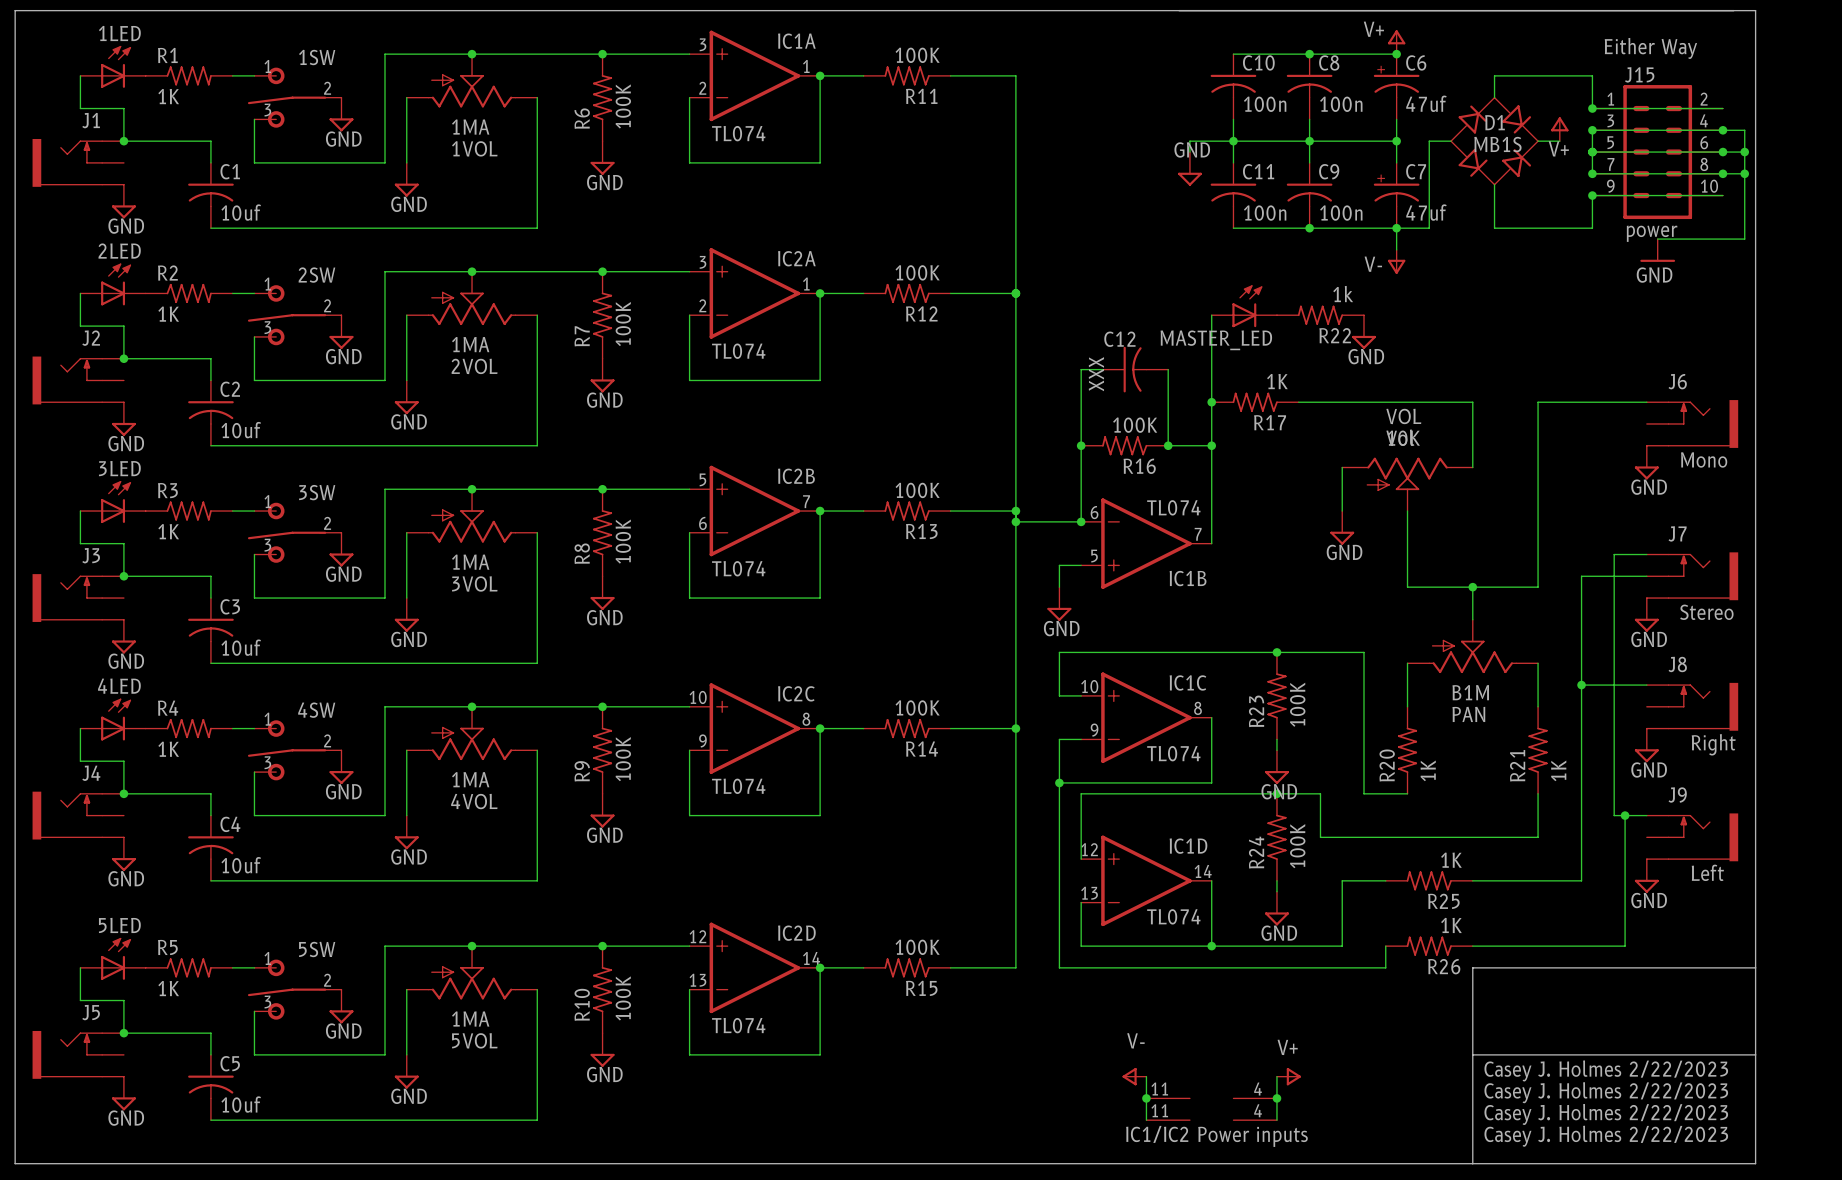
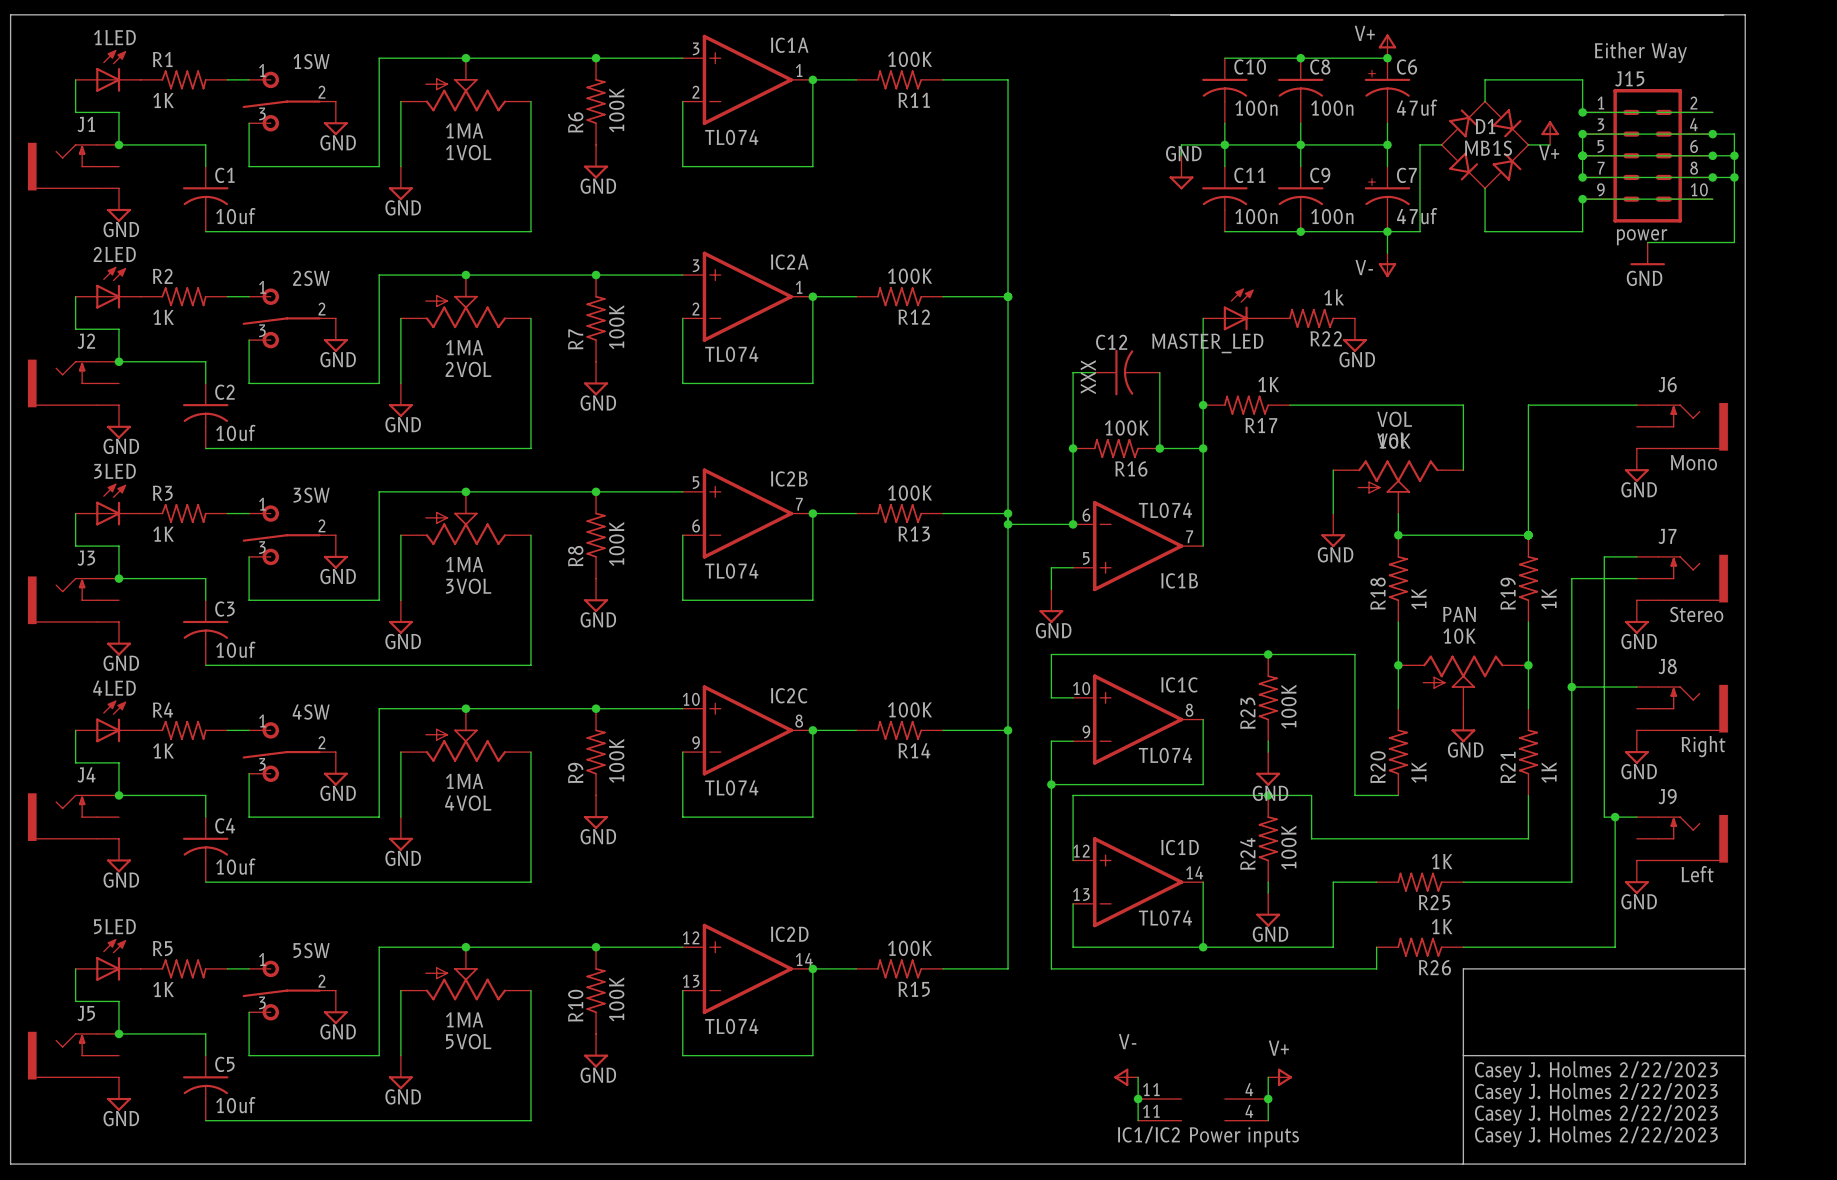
wire: (1407, 532) (1407, 587) (1538, 587) (1538, 532) -> (1398, 535) (1528, 535)
junction: none -> (1398, 535)
junction: none -> (1528, 535)
R18: none -> 1K (1398, 578)
R19: none -> 1K (1528, 578)
wire: (1472, 587) (1472, 619) -> none
junction: (1472, 587) -> none
wire: none -> (1398, 621) (1398, 665)
wire: none -> (1528, 621) (1528, 665)
PAN: B1M (1472, 646) -> none
junction: none -> (1398, 665)
junction: none -> (1528, 665)
PAN: none -> 10K (1463, 682)
power symbol: none -> GND (1463, 725)

